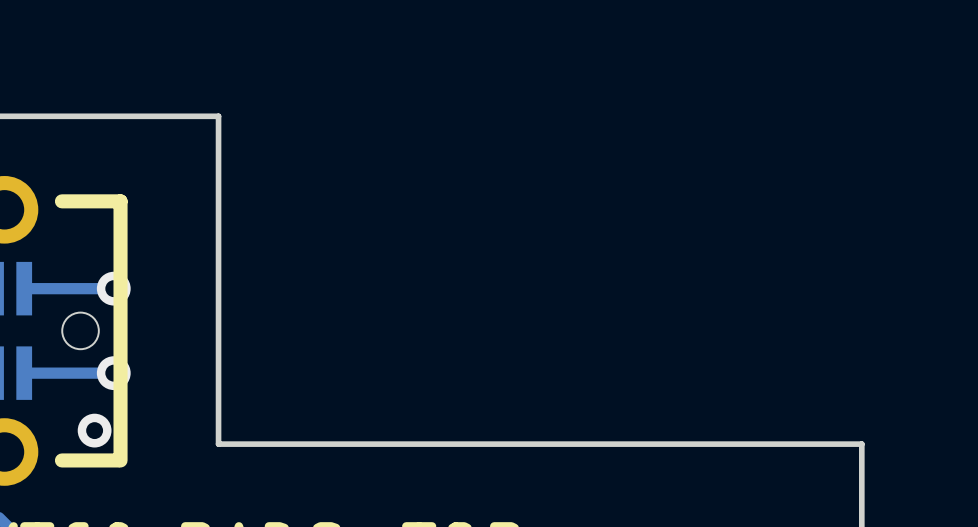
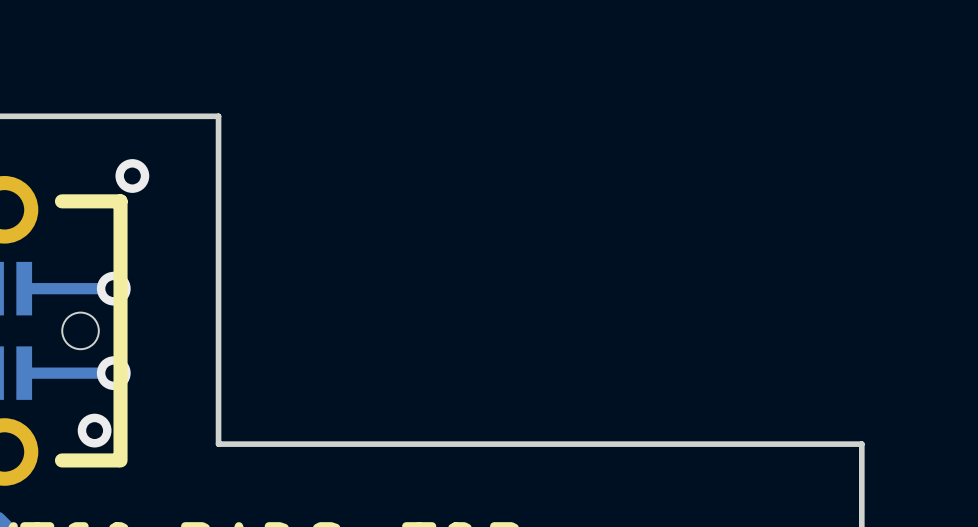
via: none -> (132, 176)

